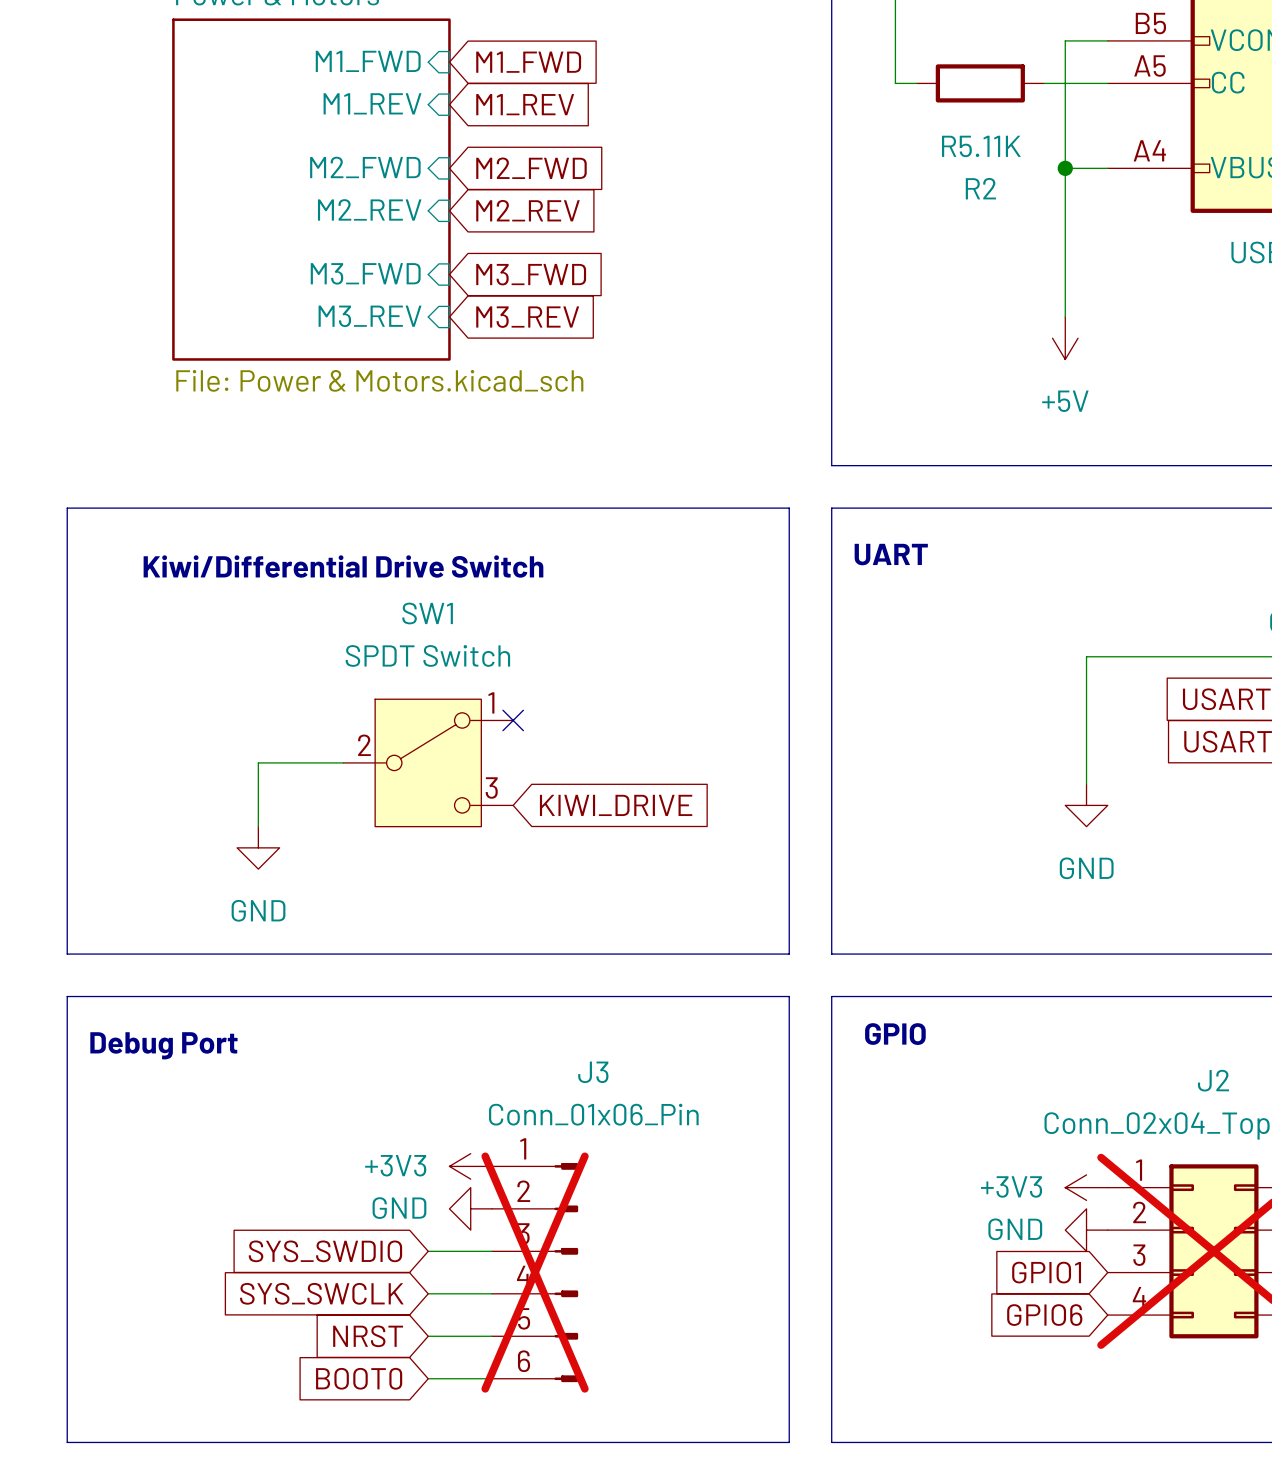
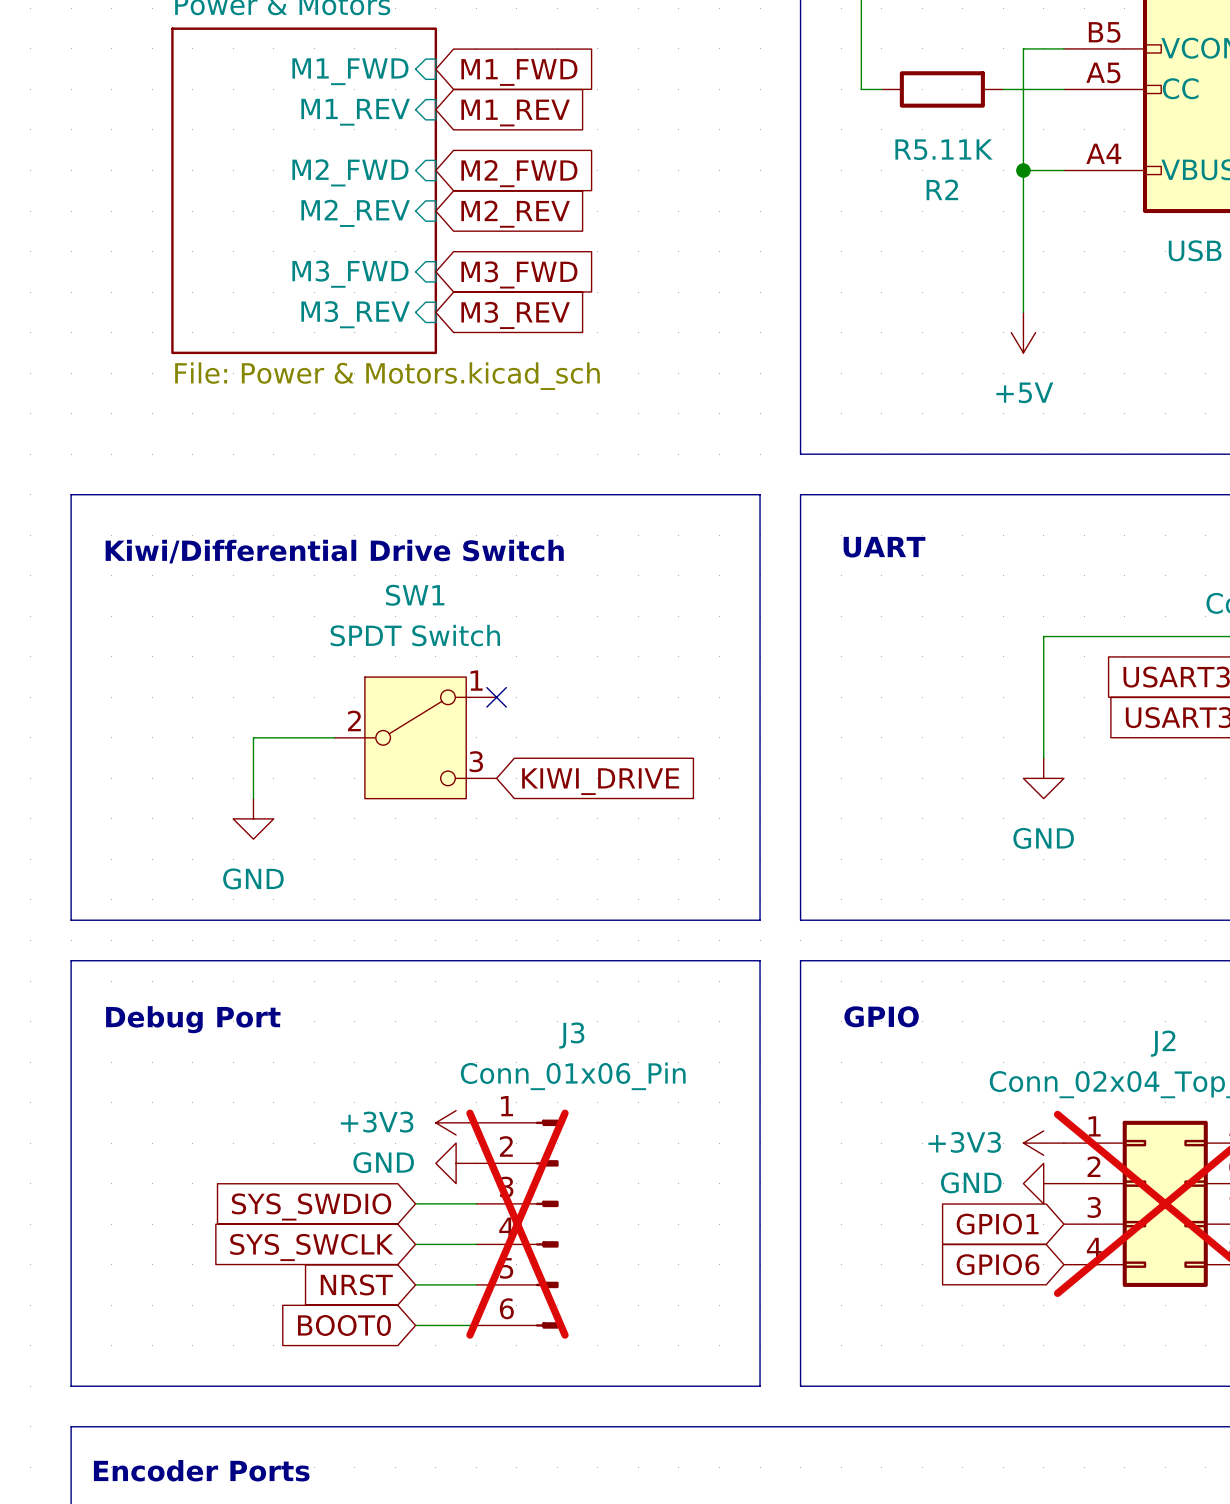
text position: UART (891, 554) -> UART (884, 547)
text position: GPIO (895, 1034) -> GPIO (881, 1016)
text position: Debug Port (163, 1045) -> Debug Port (193, 1019)

